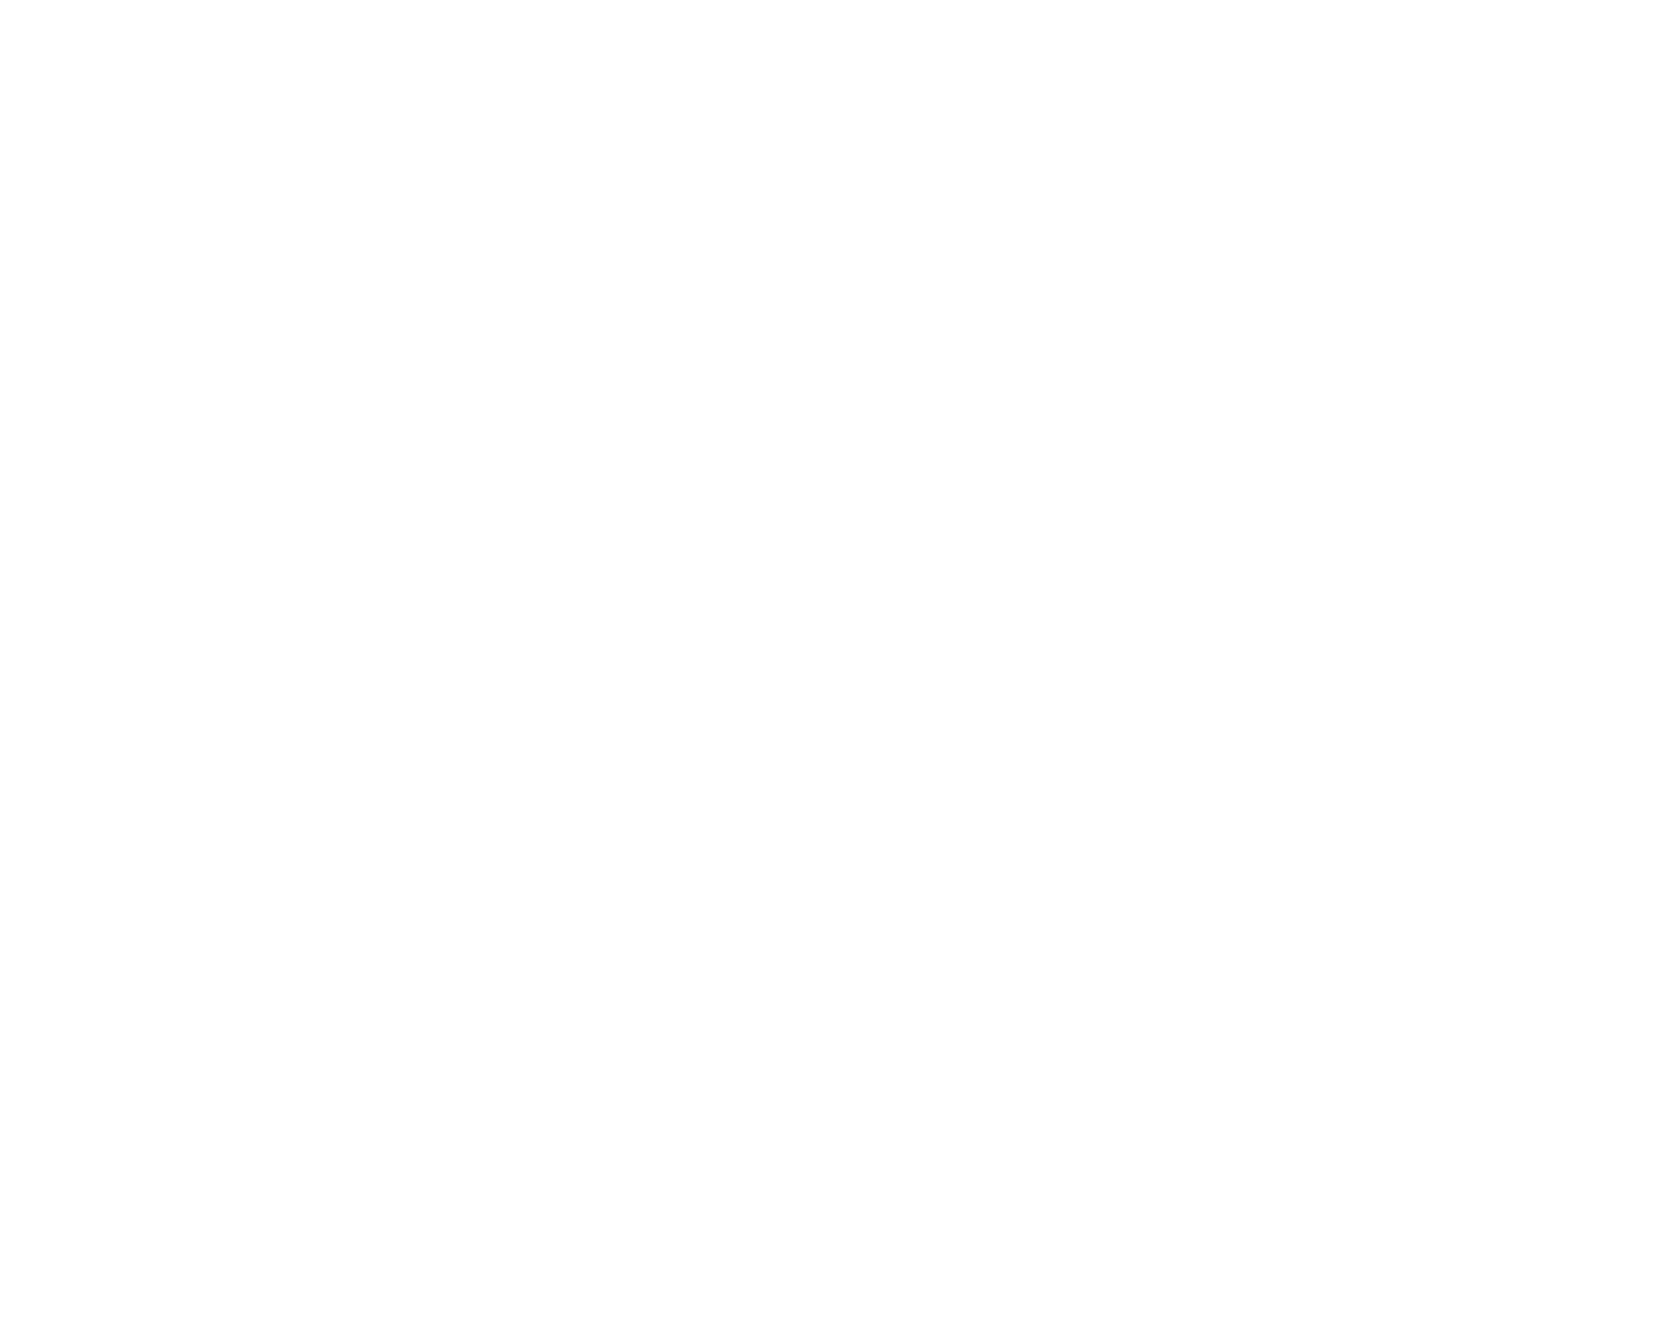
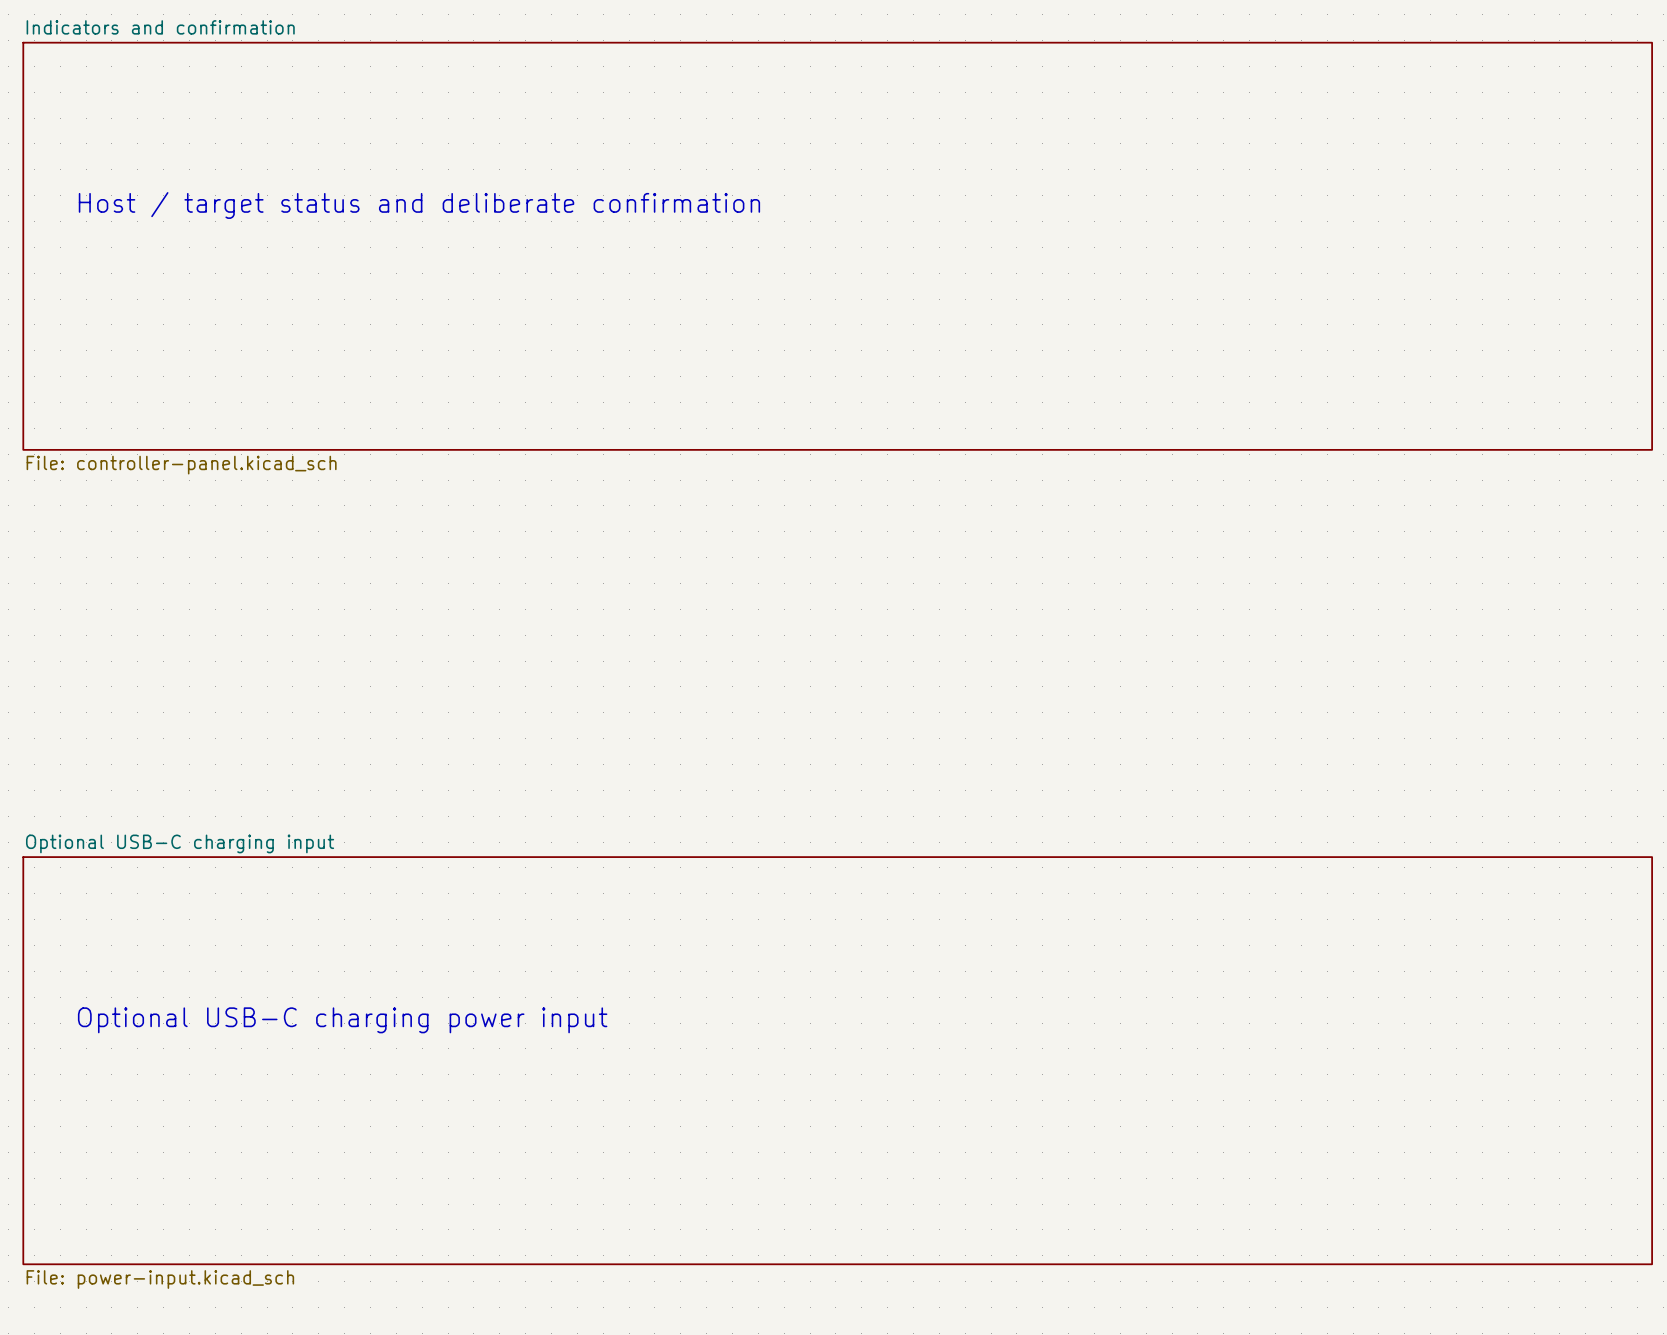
text: none -> Host / target status and deliberate confirmation (419, 205)
sheet Indicators and confirmation: none -> File: controller-panel.kicad_sch (837, 246)
text: none -> Optional USB-C charging power input (342, 1020)
sheet Optional USB-C charging input: none -> File: power-input.kicad_sch (837, 1060)

